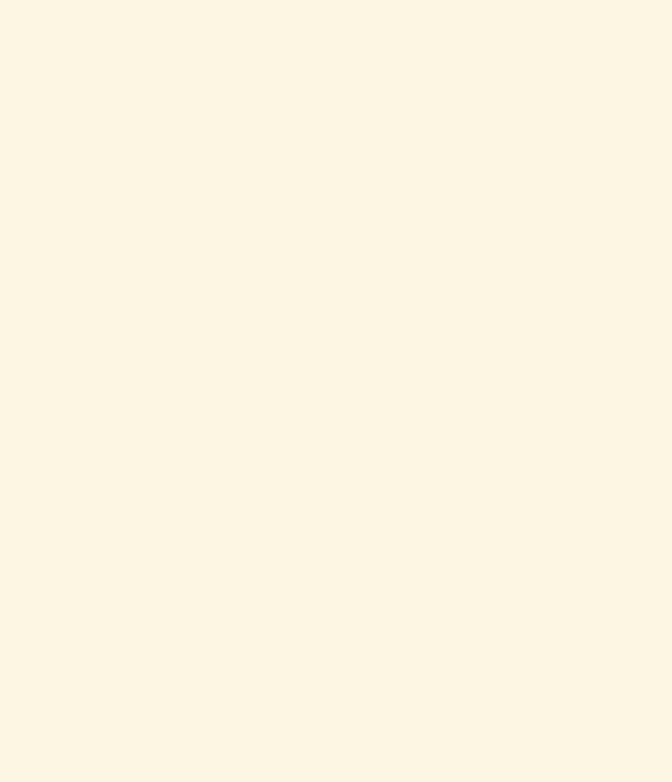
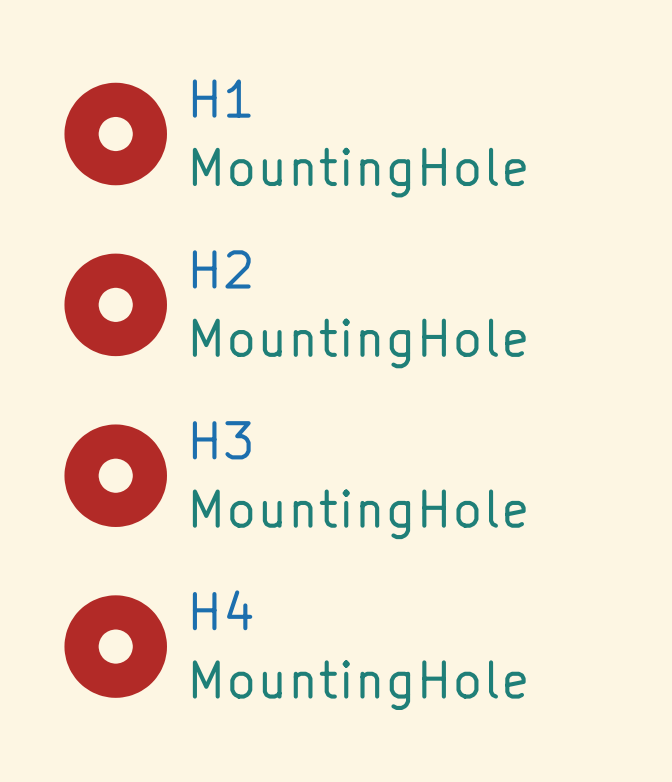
H1: none -> MountingHole (115, 134)
H2: none -> MountingHole (115, 304)
H3: none -> MountingHole (115, 475)
H4: none -> MountingHole (115, 646)

